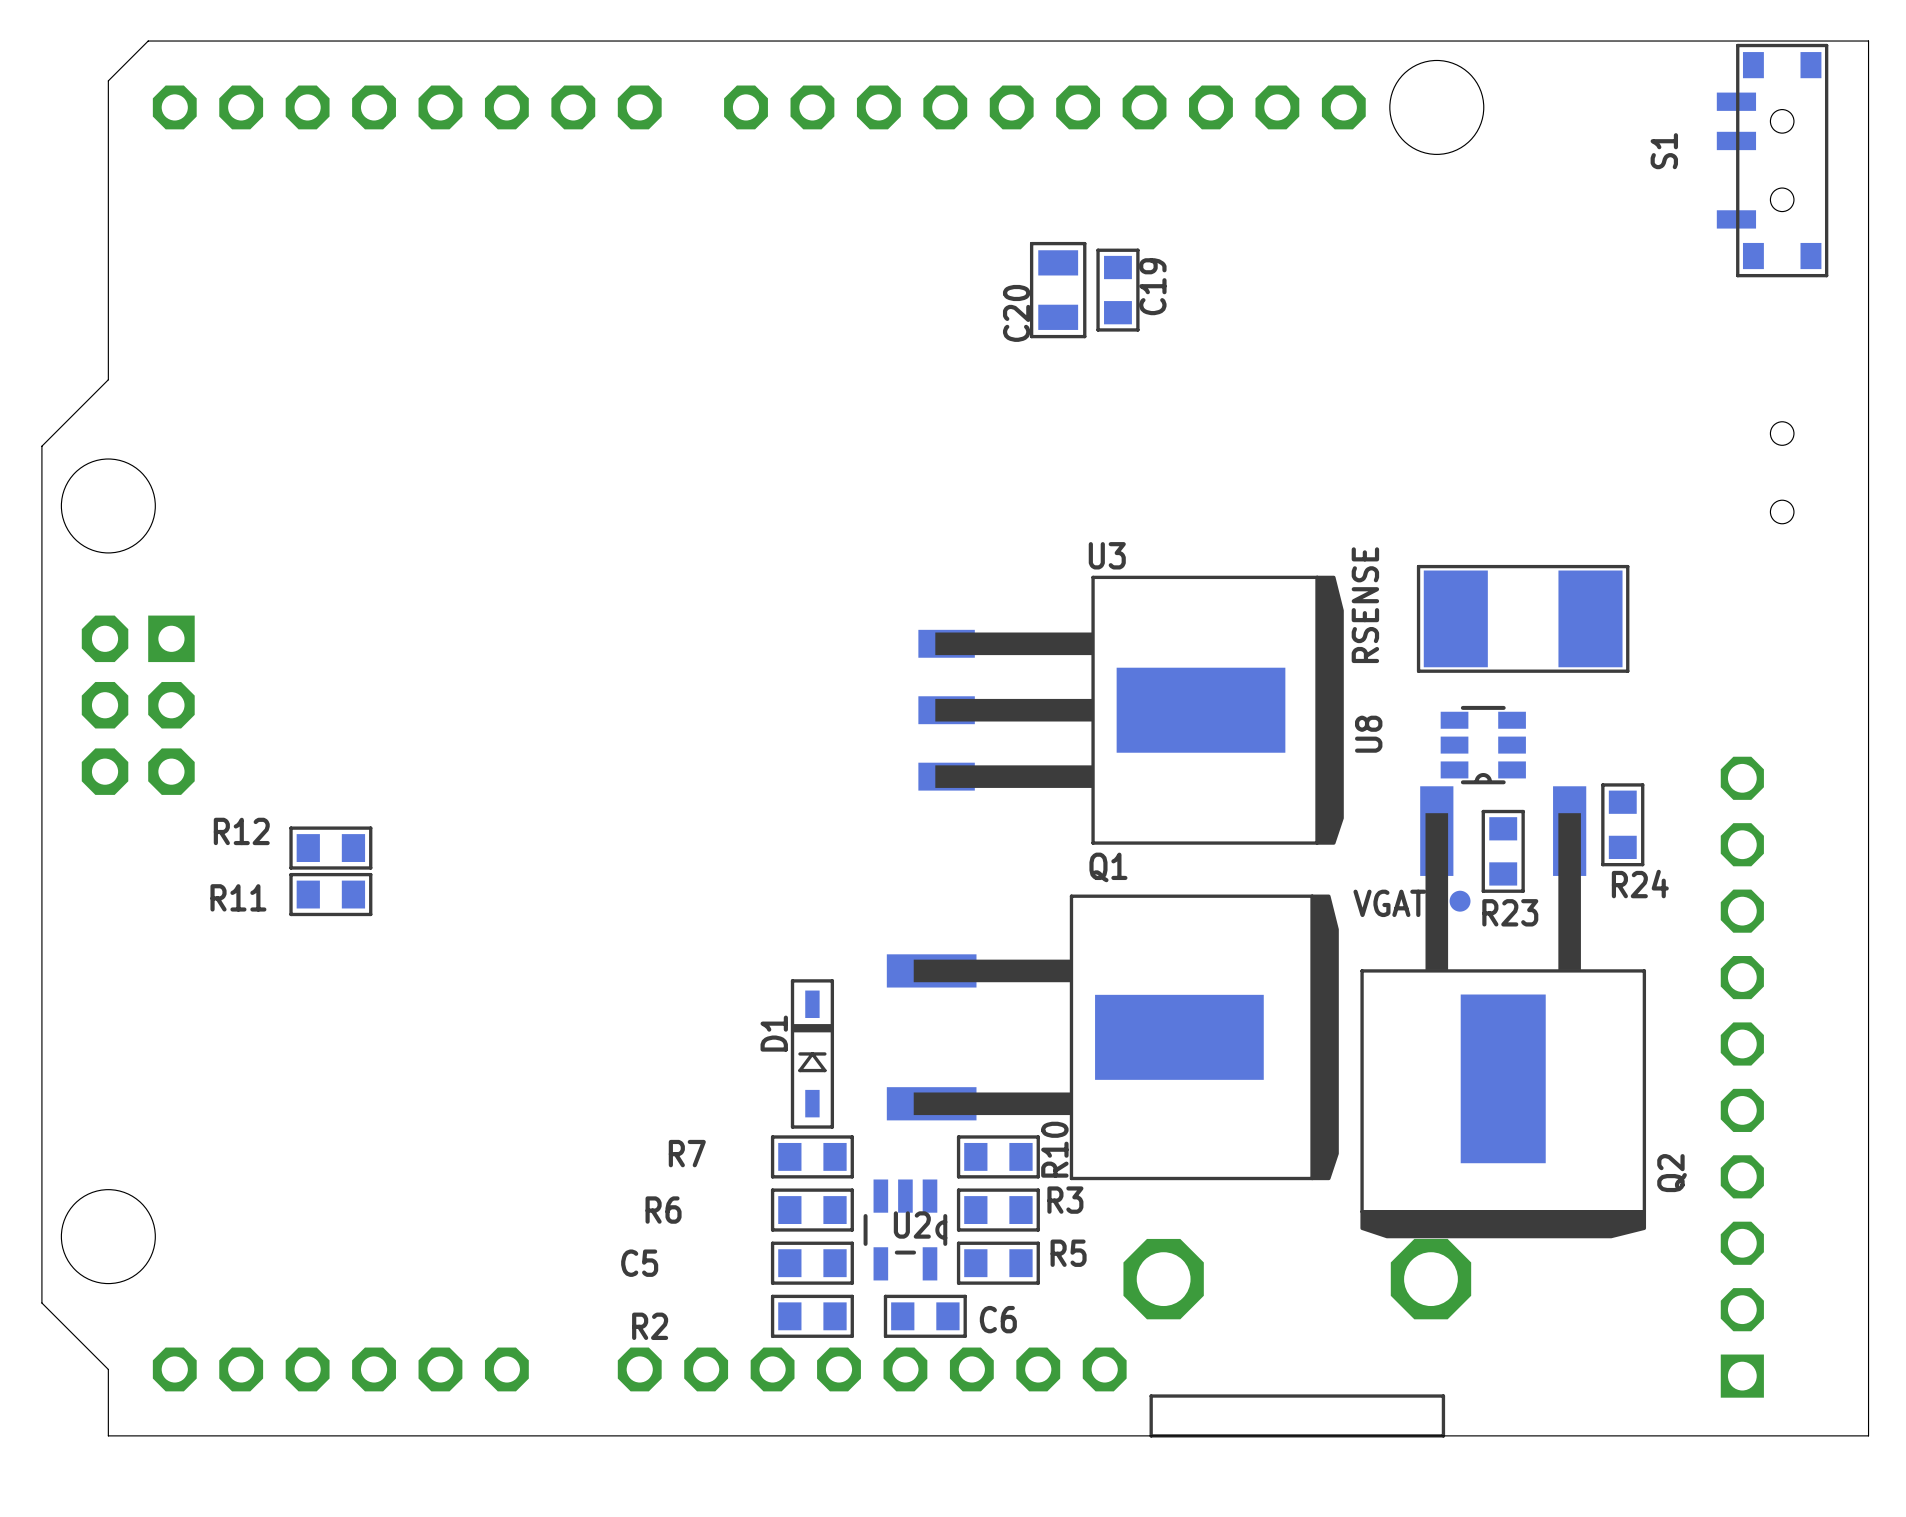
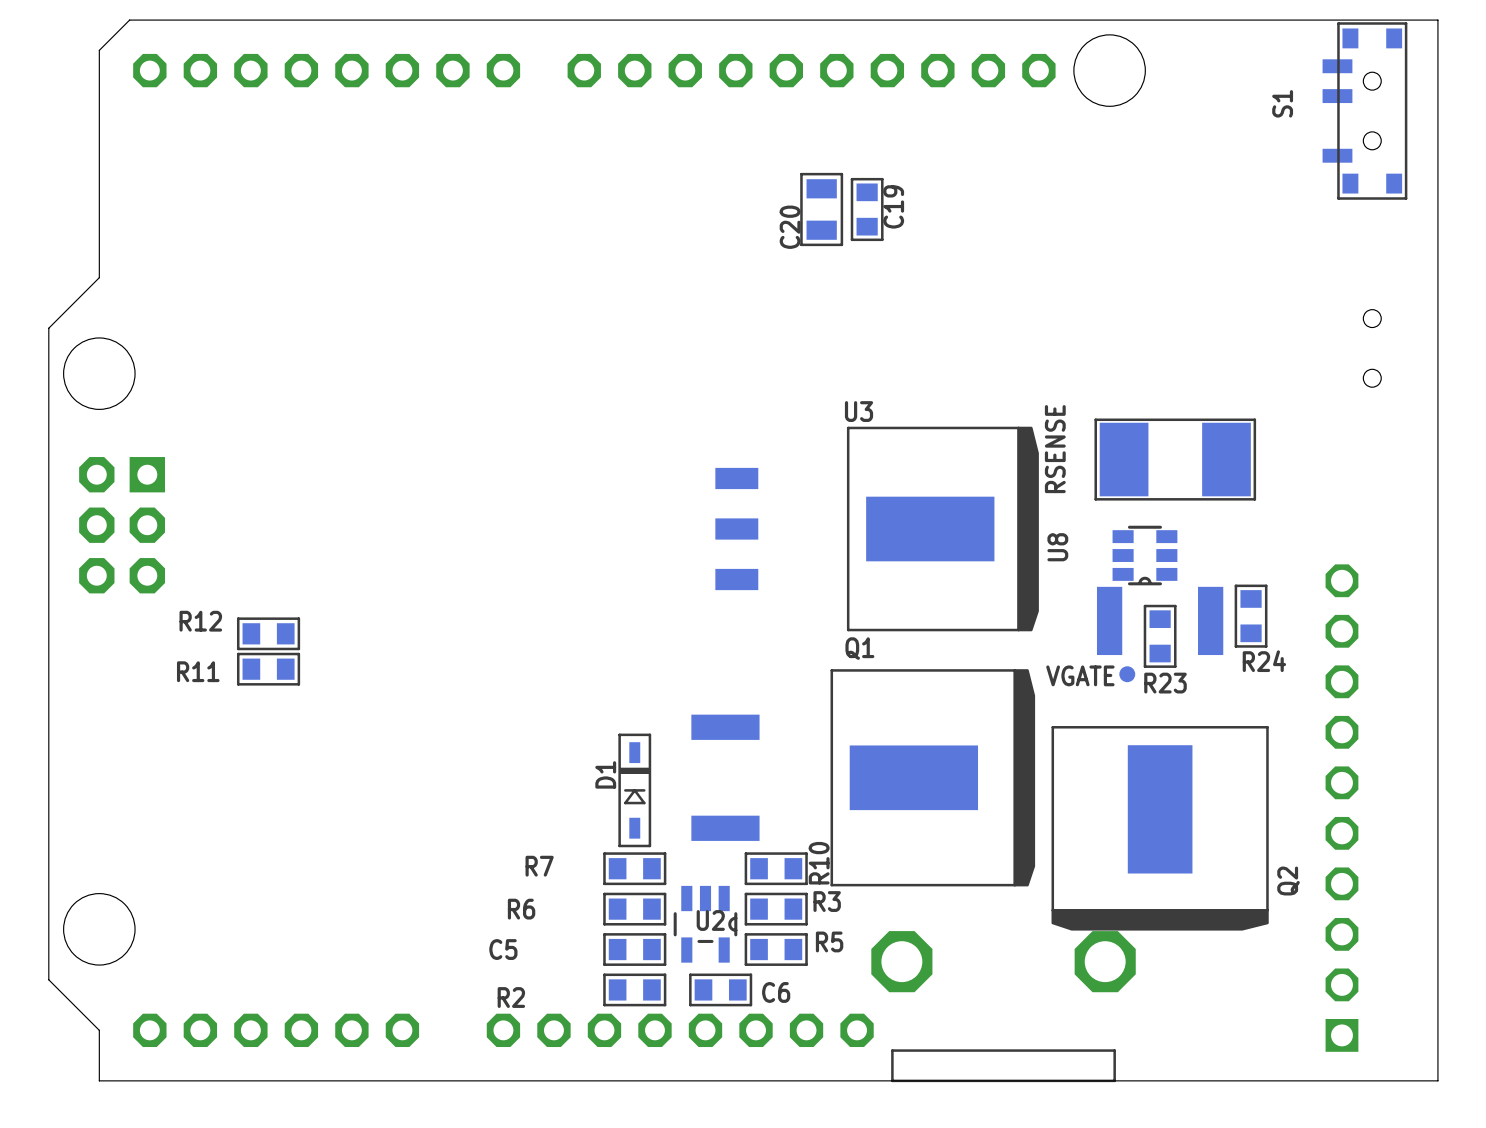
U3 footprint: [918, 575, 1344, 845] -> [715, 426, 1039, 632]
Q2 footprint: [1360, 786, 1647, 1239] -> [1051, 586, 1269, 931]
Q1 footprint: [886, 894, 1339, 1181] -> [691, 669, 1036, 887]

